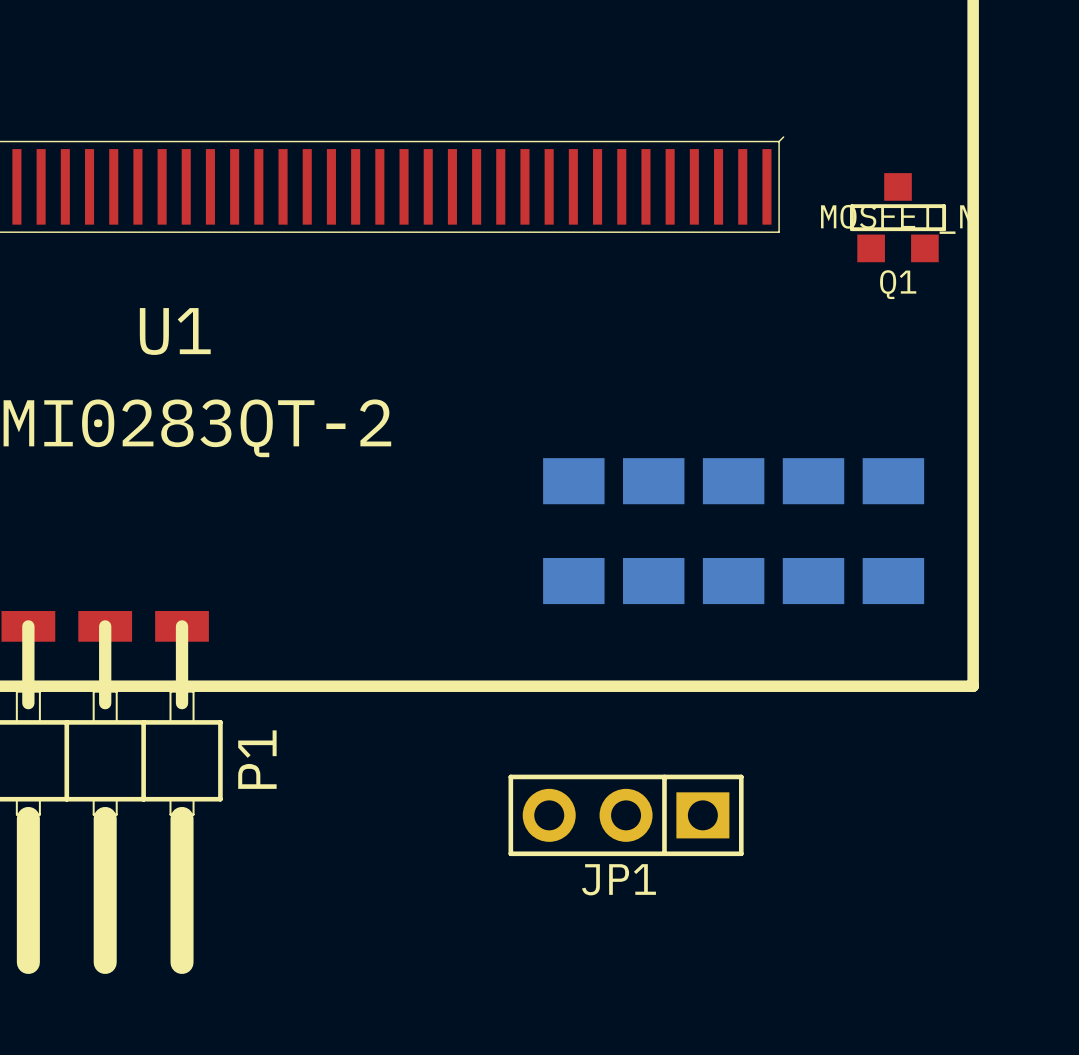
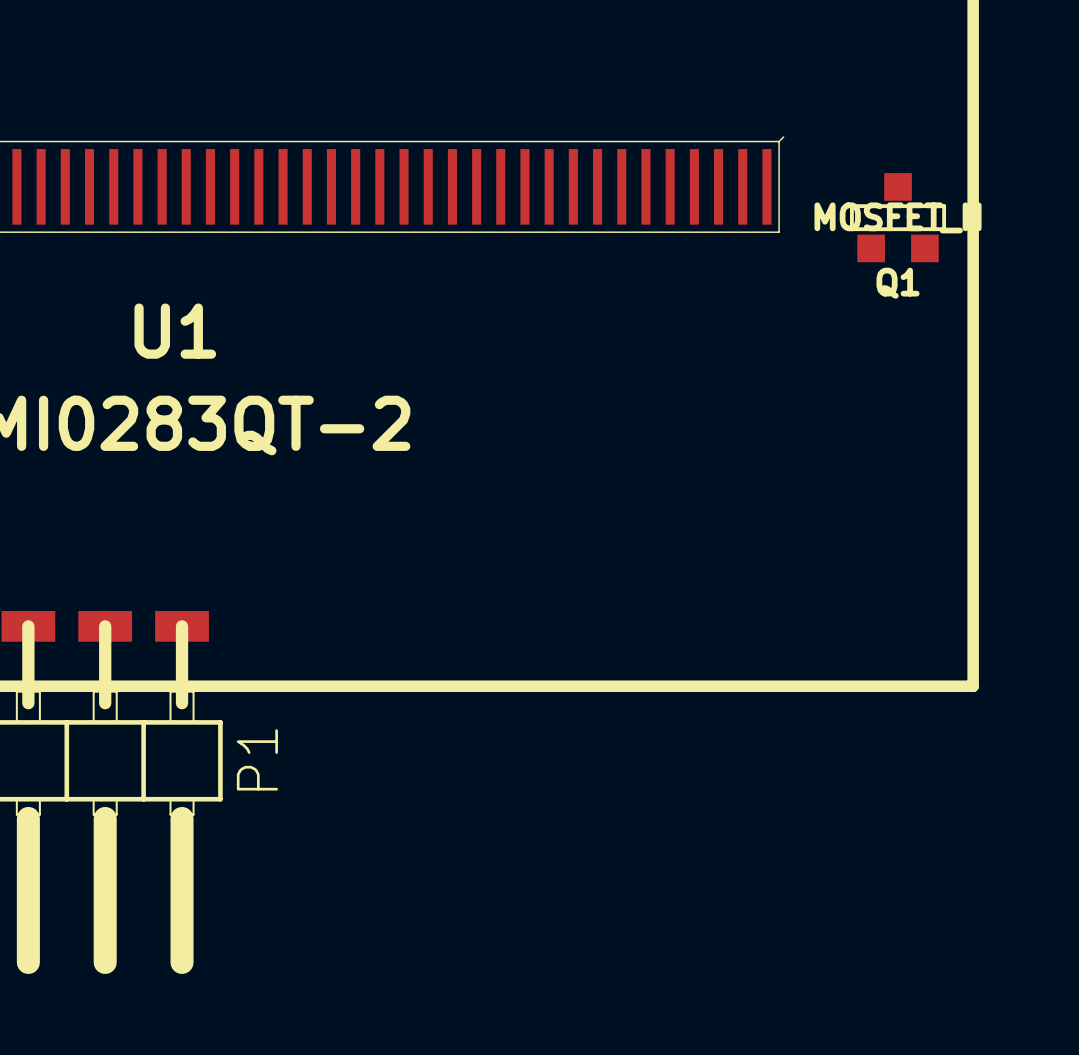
part: (573, 531) -> none
part: (653, 531) -> none
part: (733, 531) -> none
part: (813, 531) -> none
part: (893, 531) -> none
JP1: (626, 815) -> none

